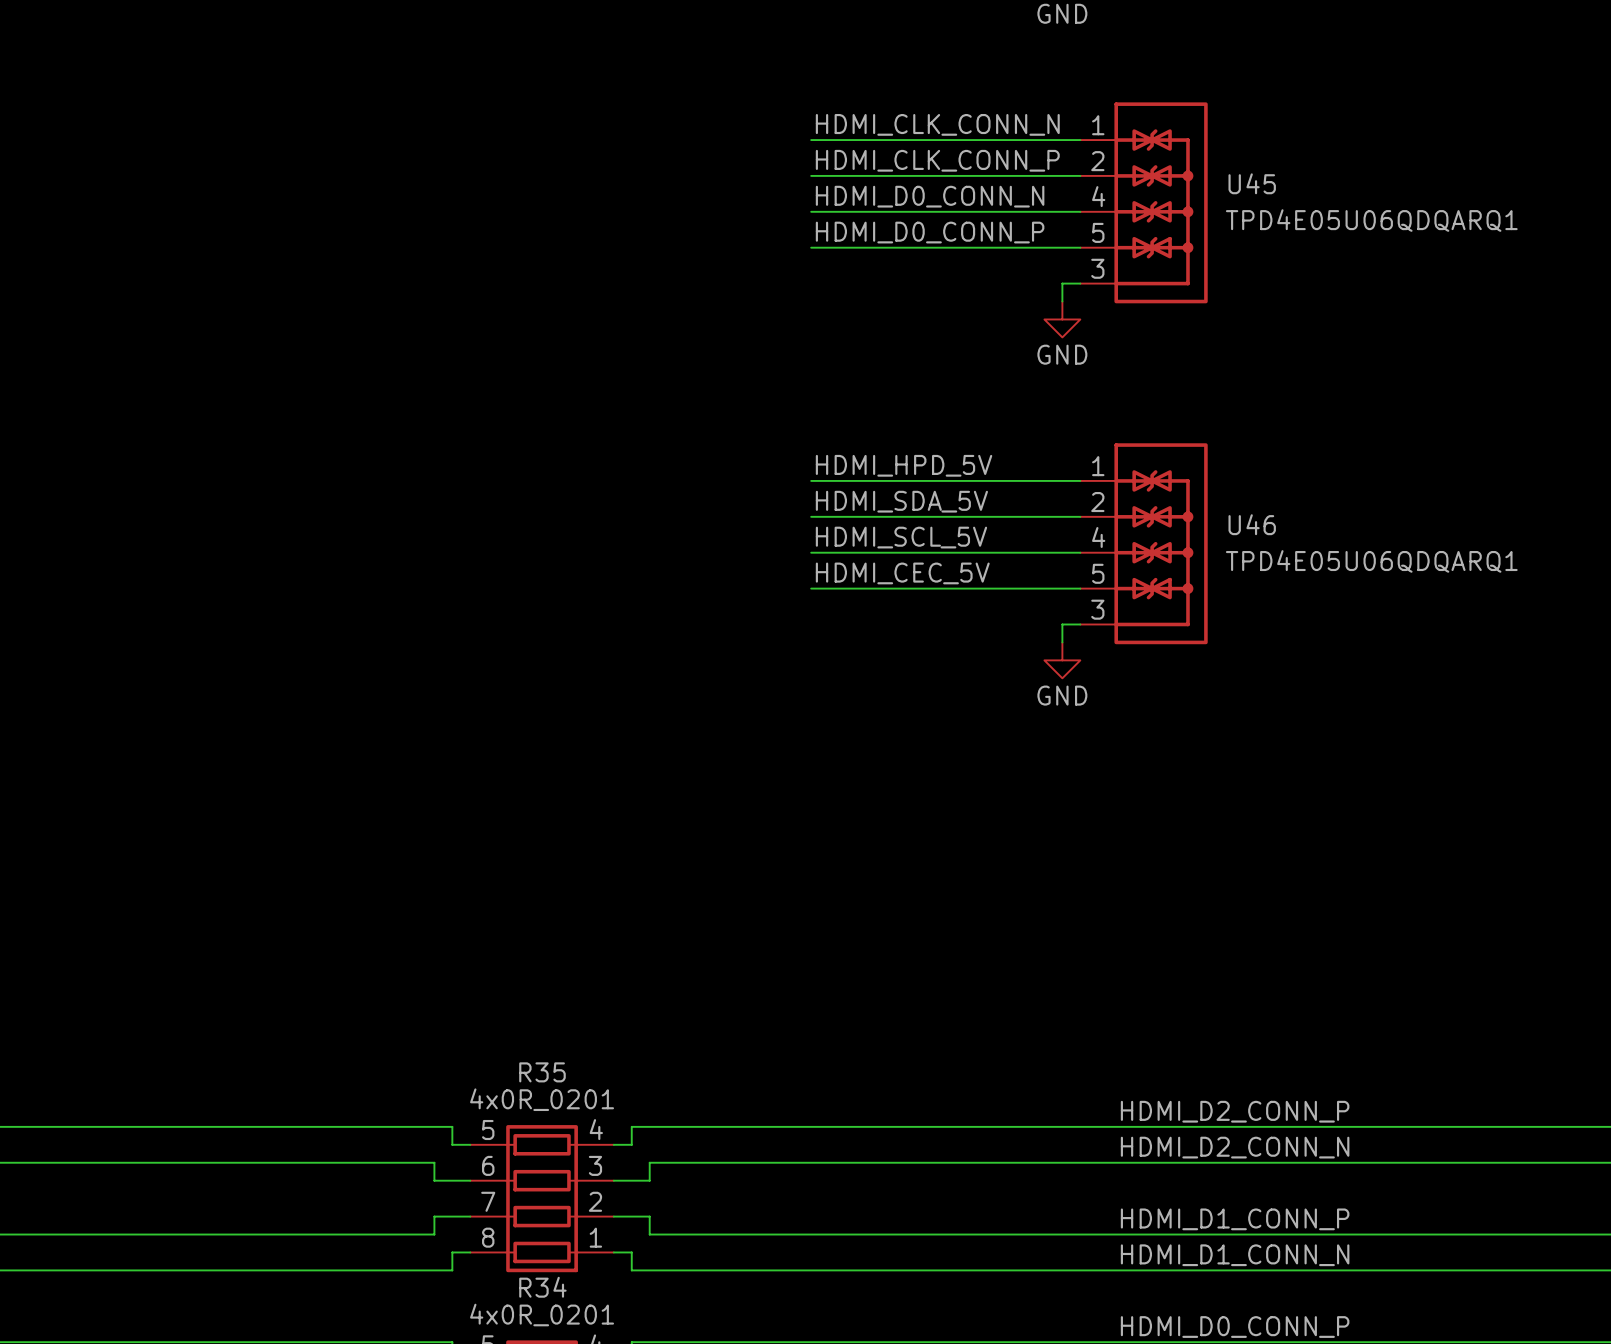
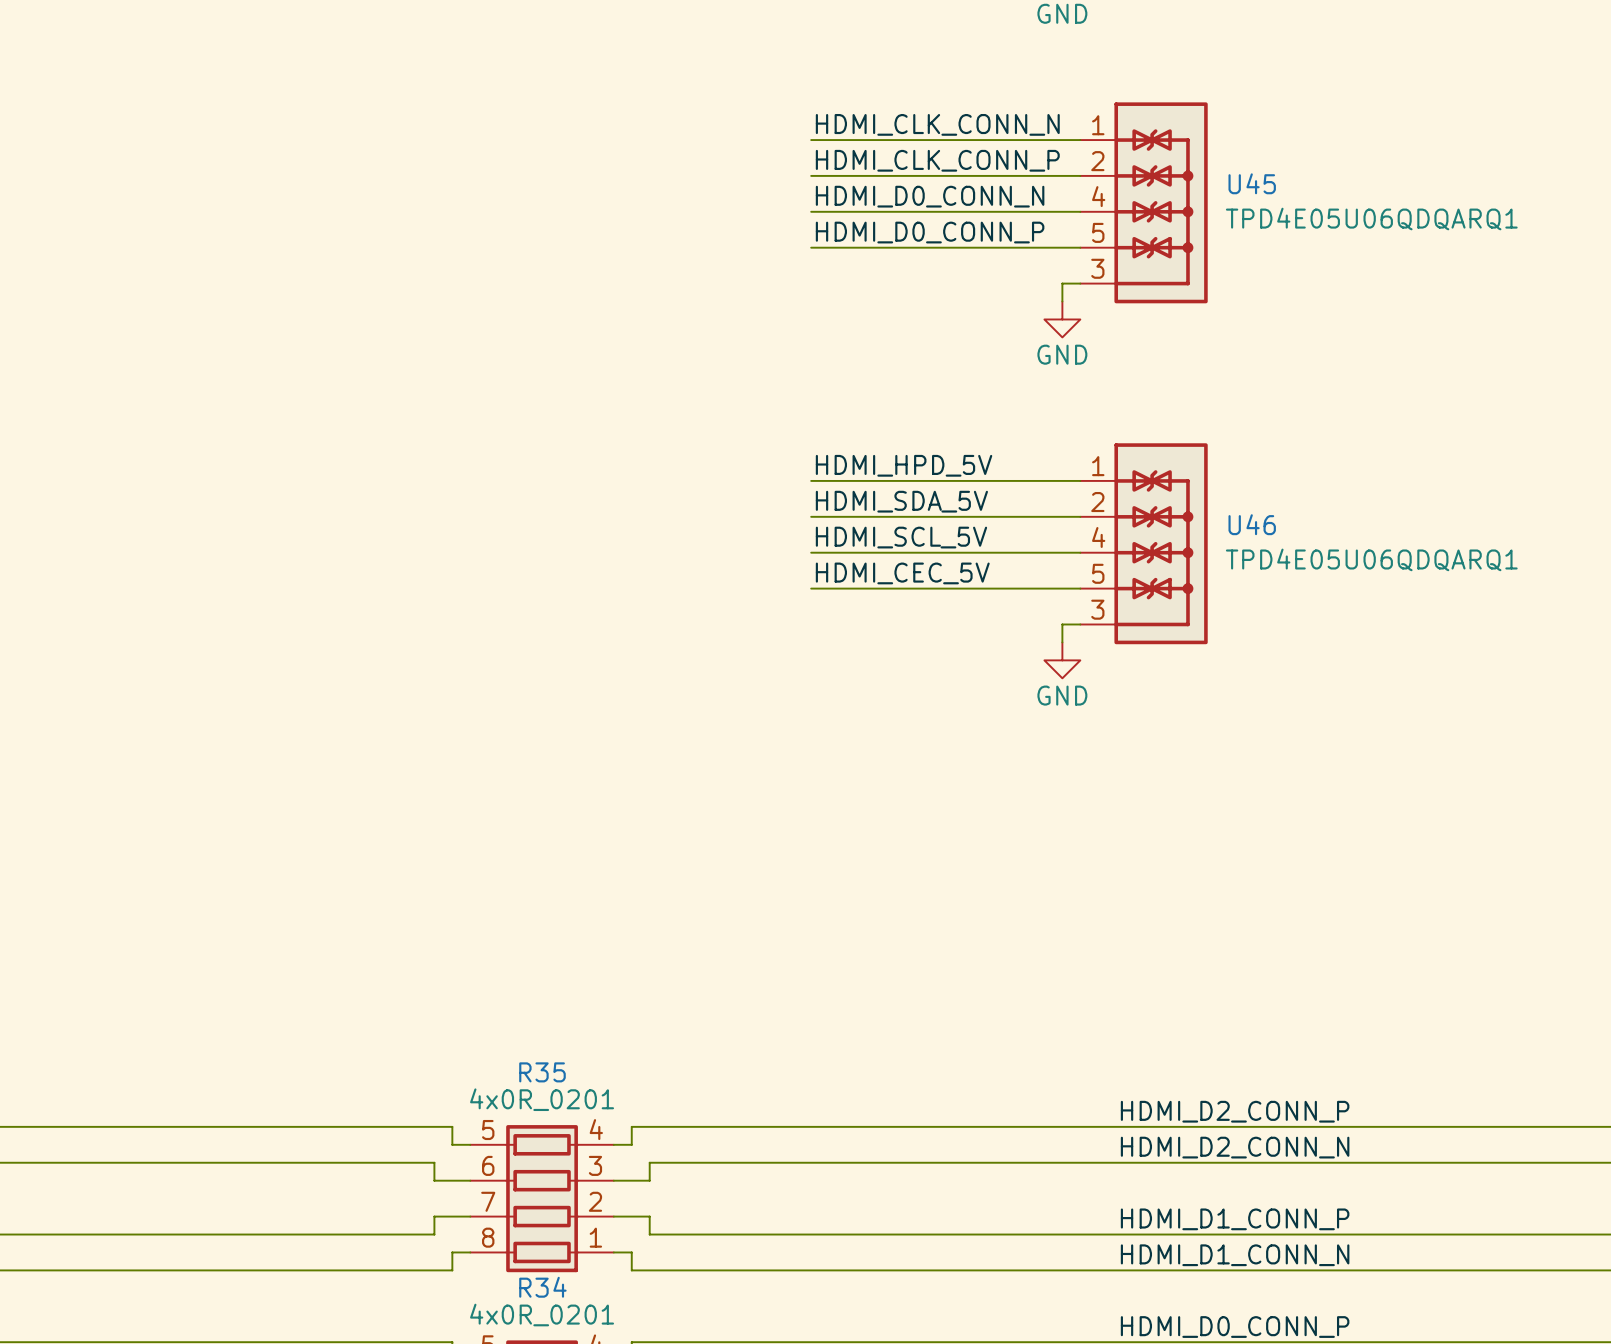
U45 value: none -> TPD4E05U06QDQARQ1 (1371, 219)
U45 text: TPD4E05U06QDQARQ1 (1371, 220) -> none
U46 value: none -> TPD4E05U06QDQARQ1 (1371, 559)
U46 text: TPD4E05U06QDQARQ1 (1371, 561) -> none

